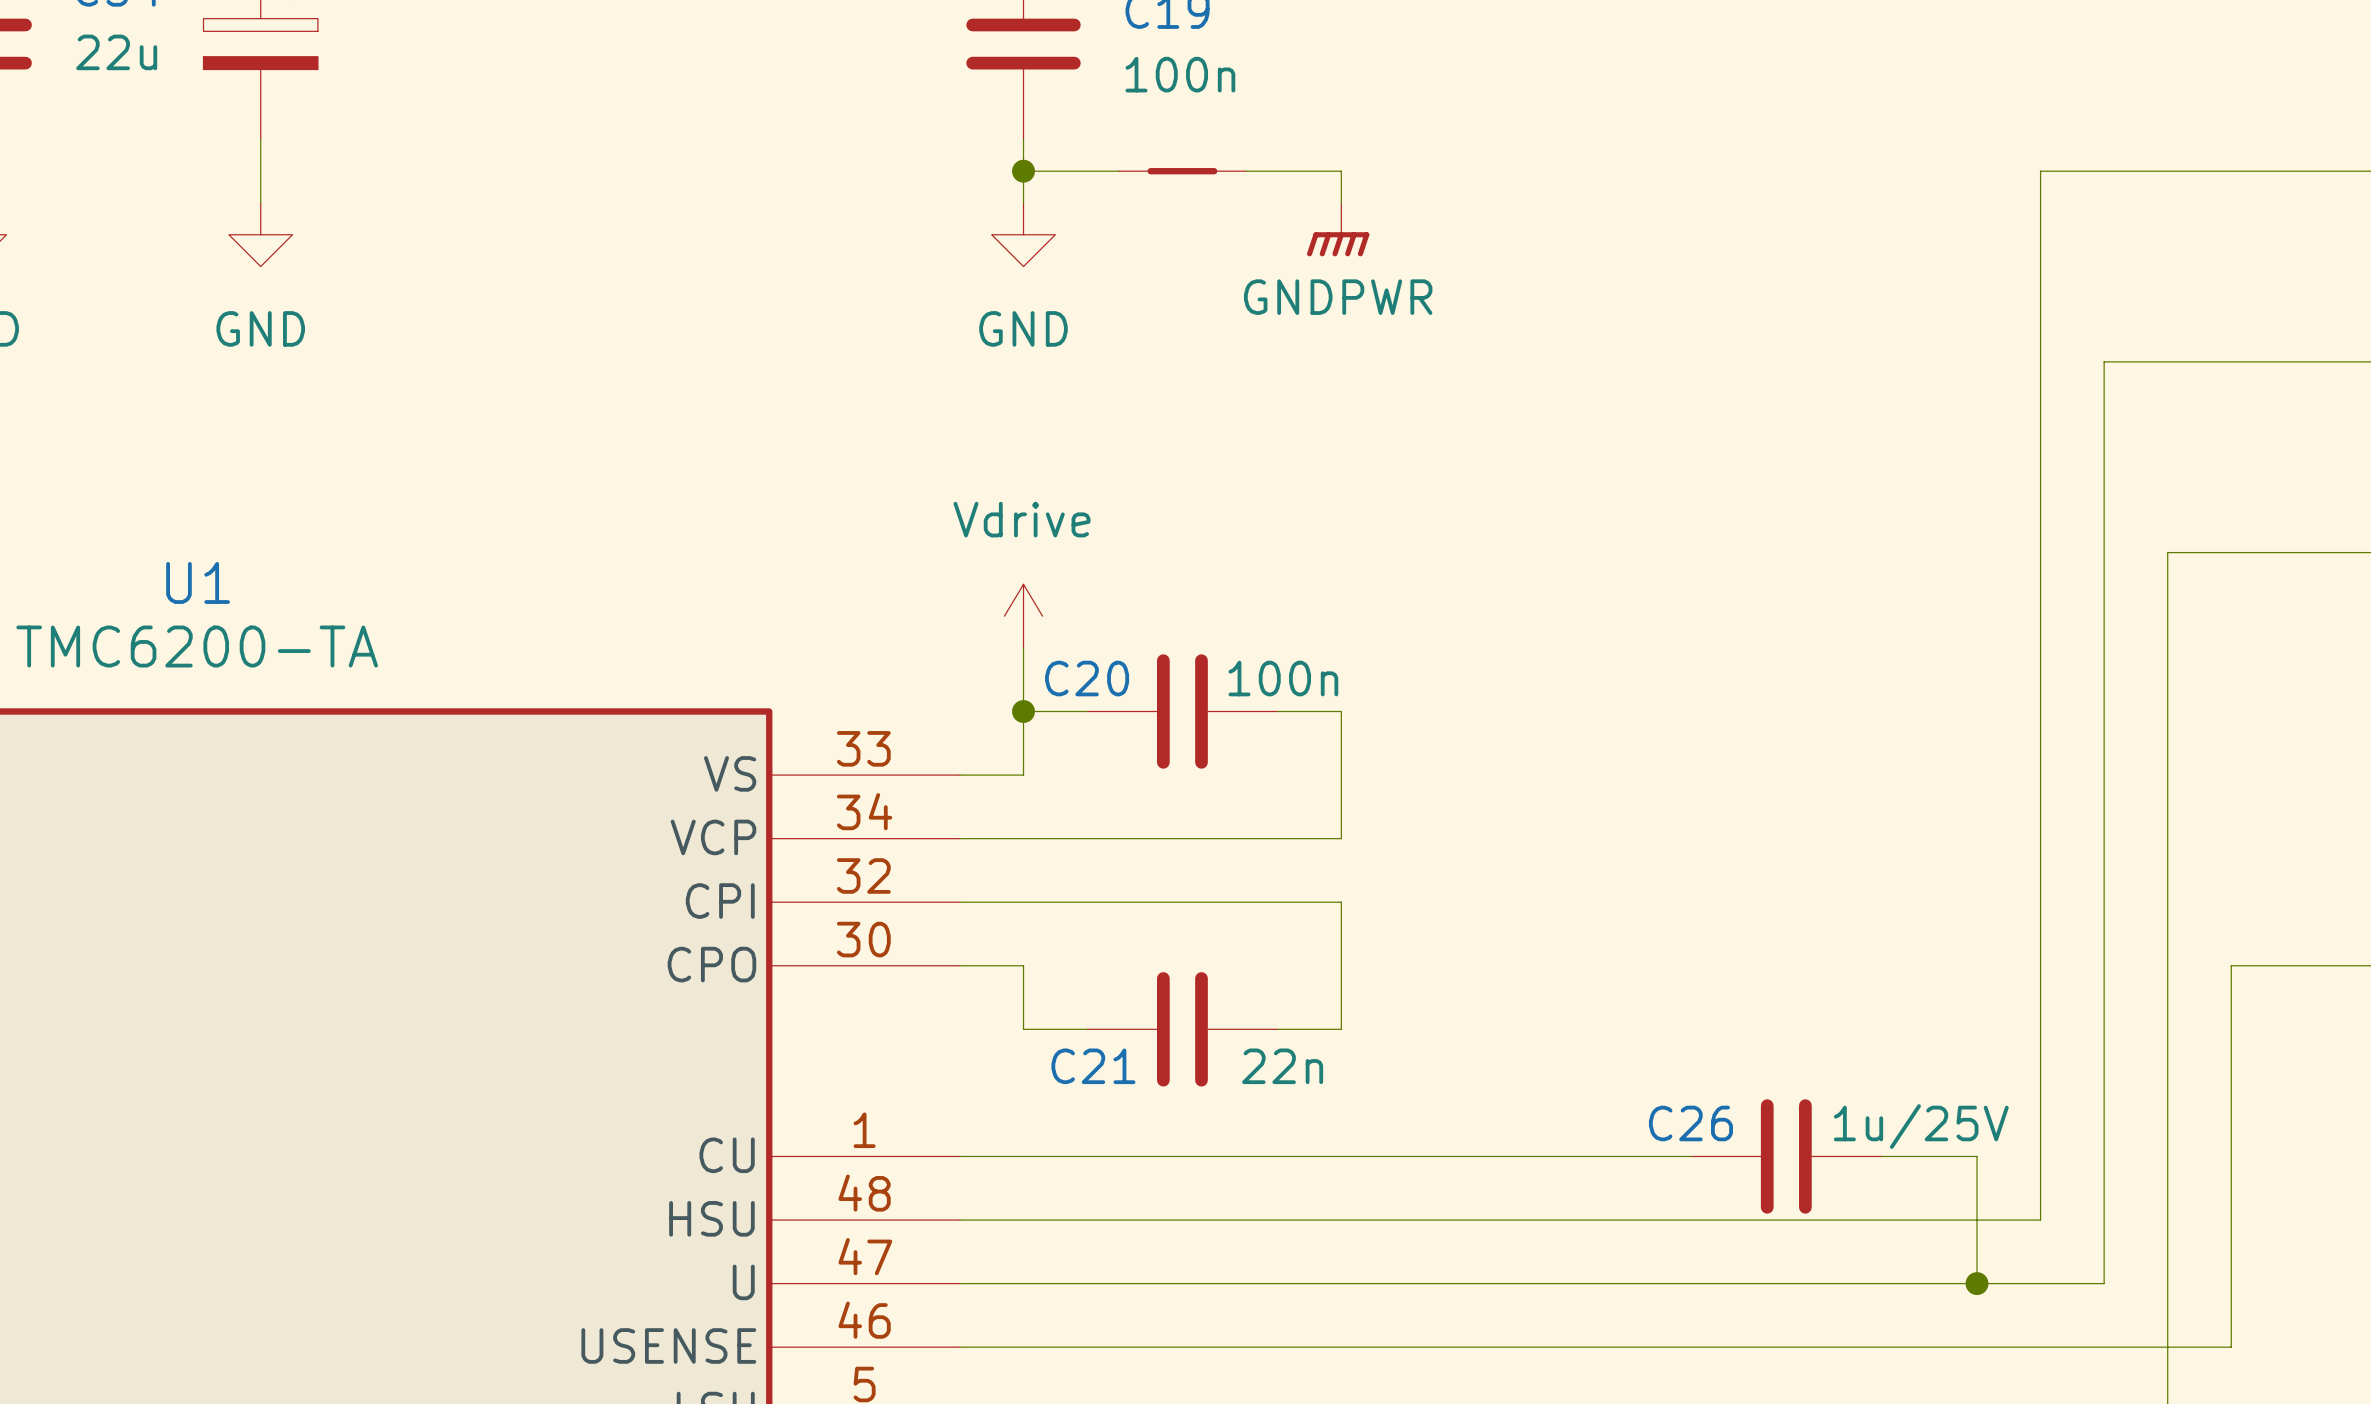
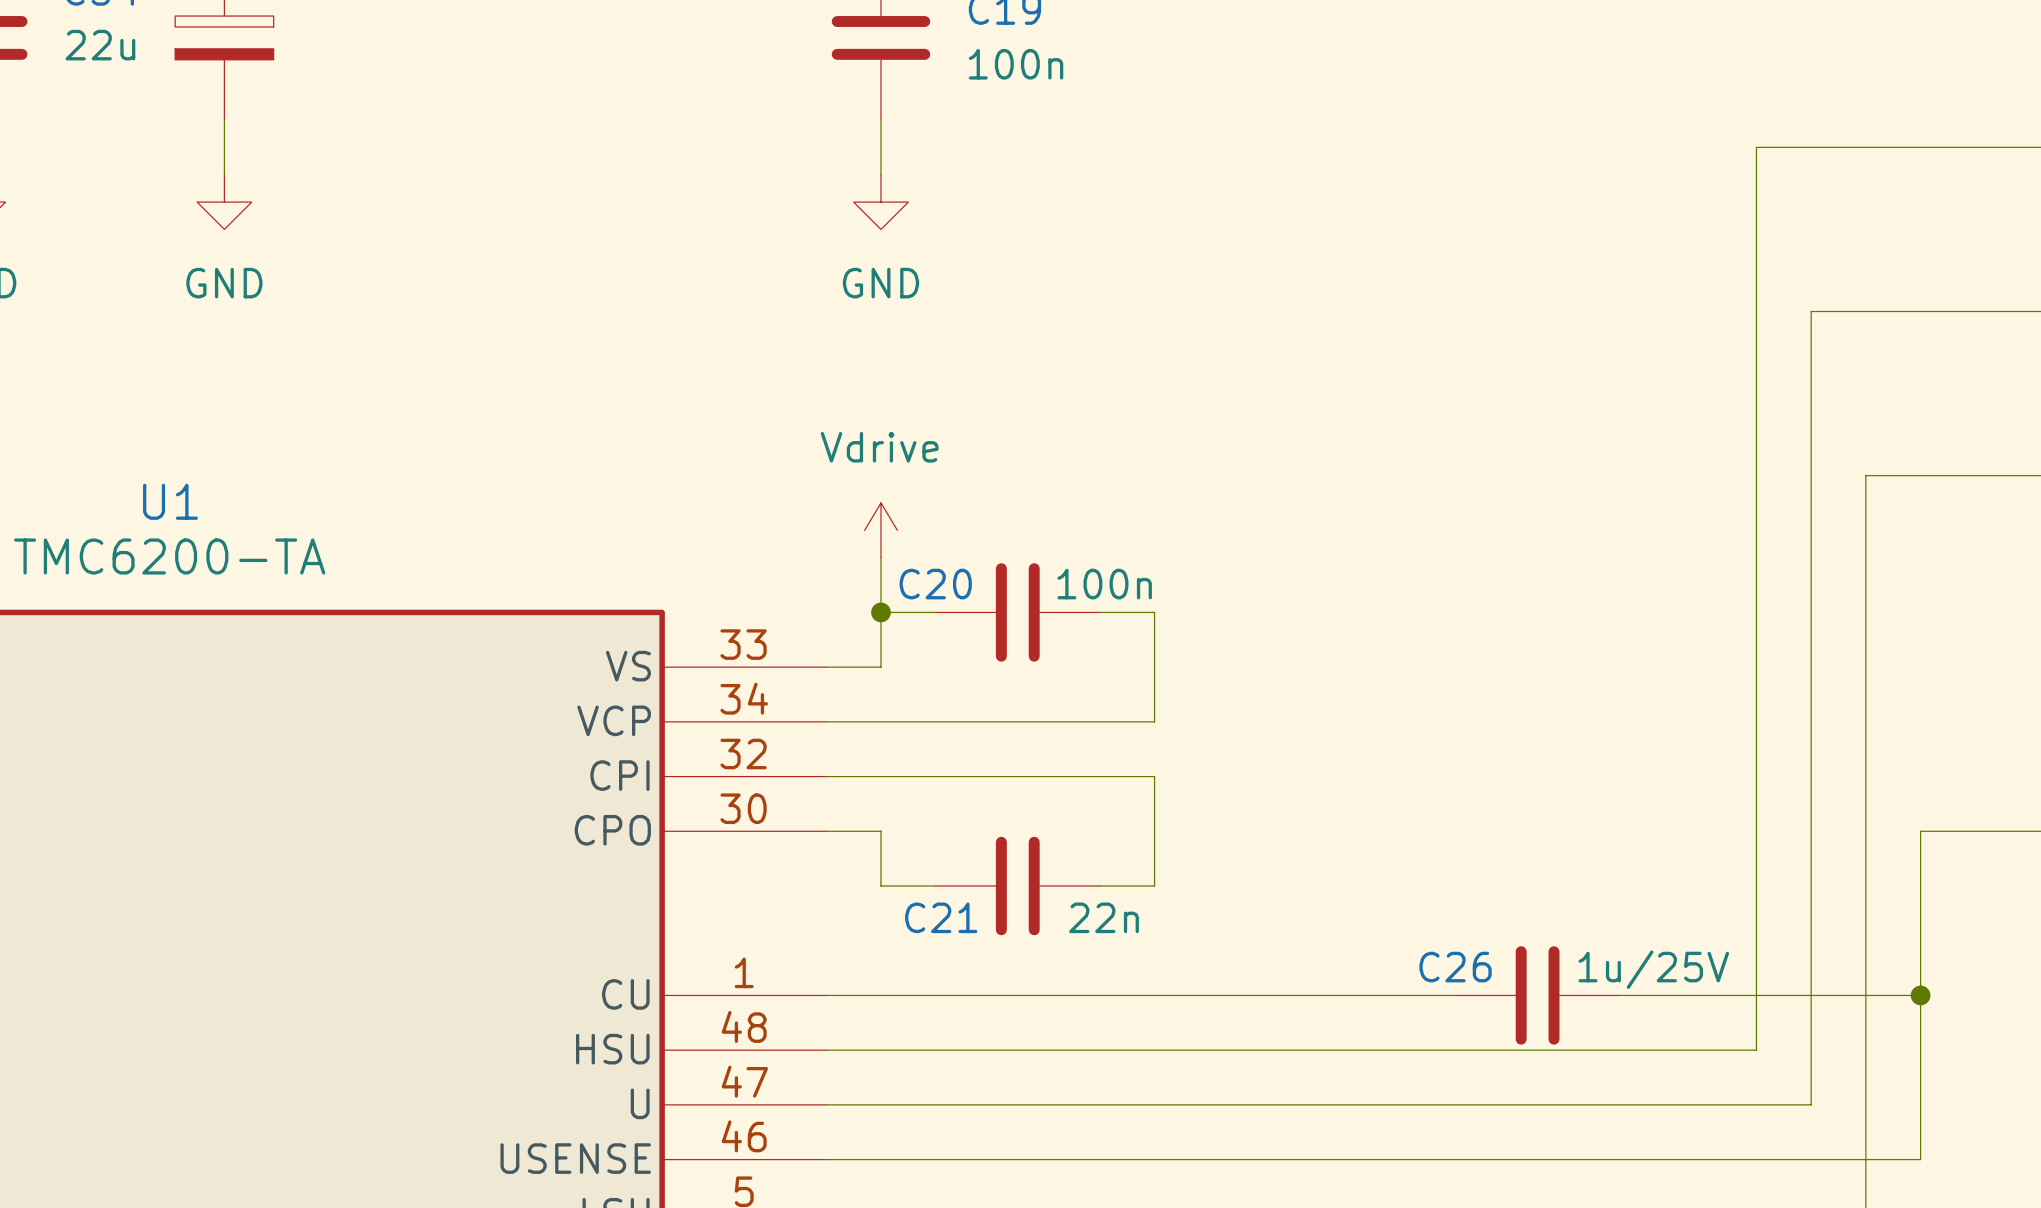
wire: (1023, 171) (1118, 171) -> none
junction: (1023, 171) -> none
part: (1182, 171) -> none
wire: (1245, 171) (1341, 171) (1341, 202) -> none
power symbol: GNDPWR (1338, 229) -> none
wire: (1977, 1156) (1977, 1283) -> (1701, 995) (1920, 995)
junction: none -> (1920, 995)
junction: (1977, 1283) -> none

